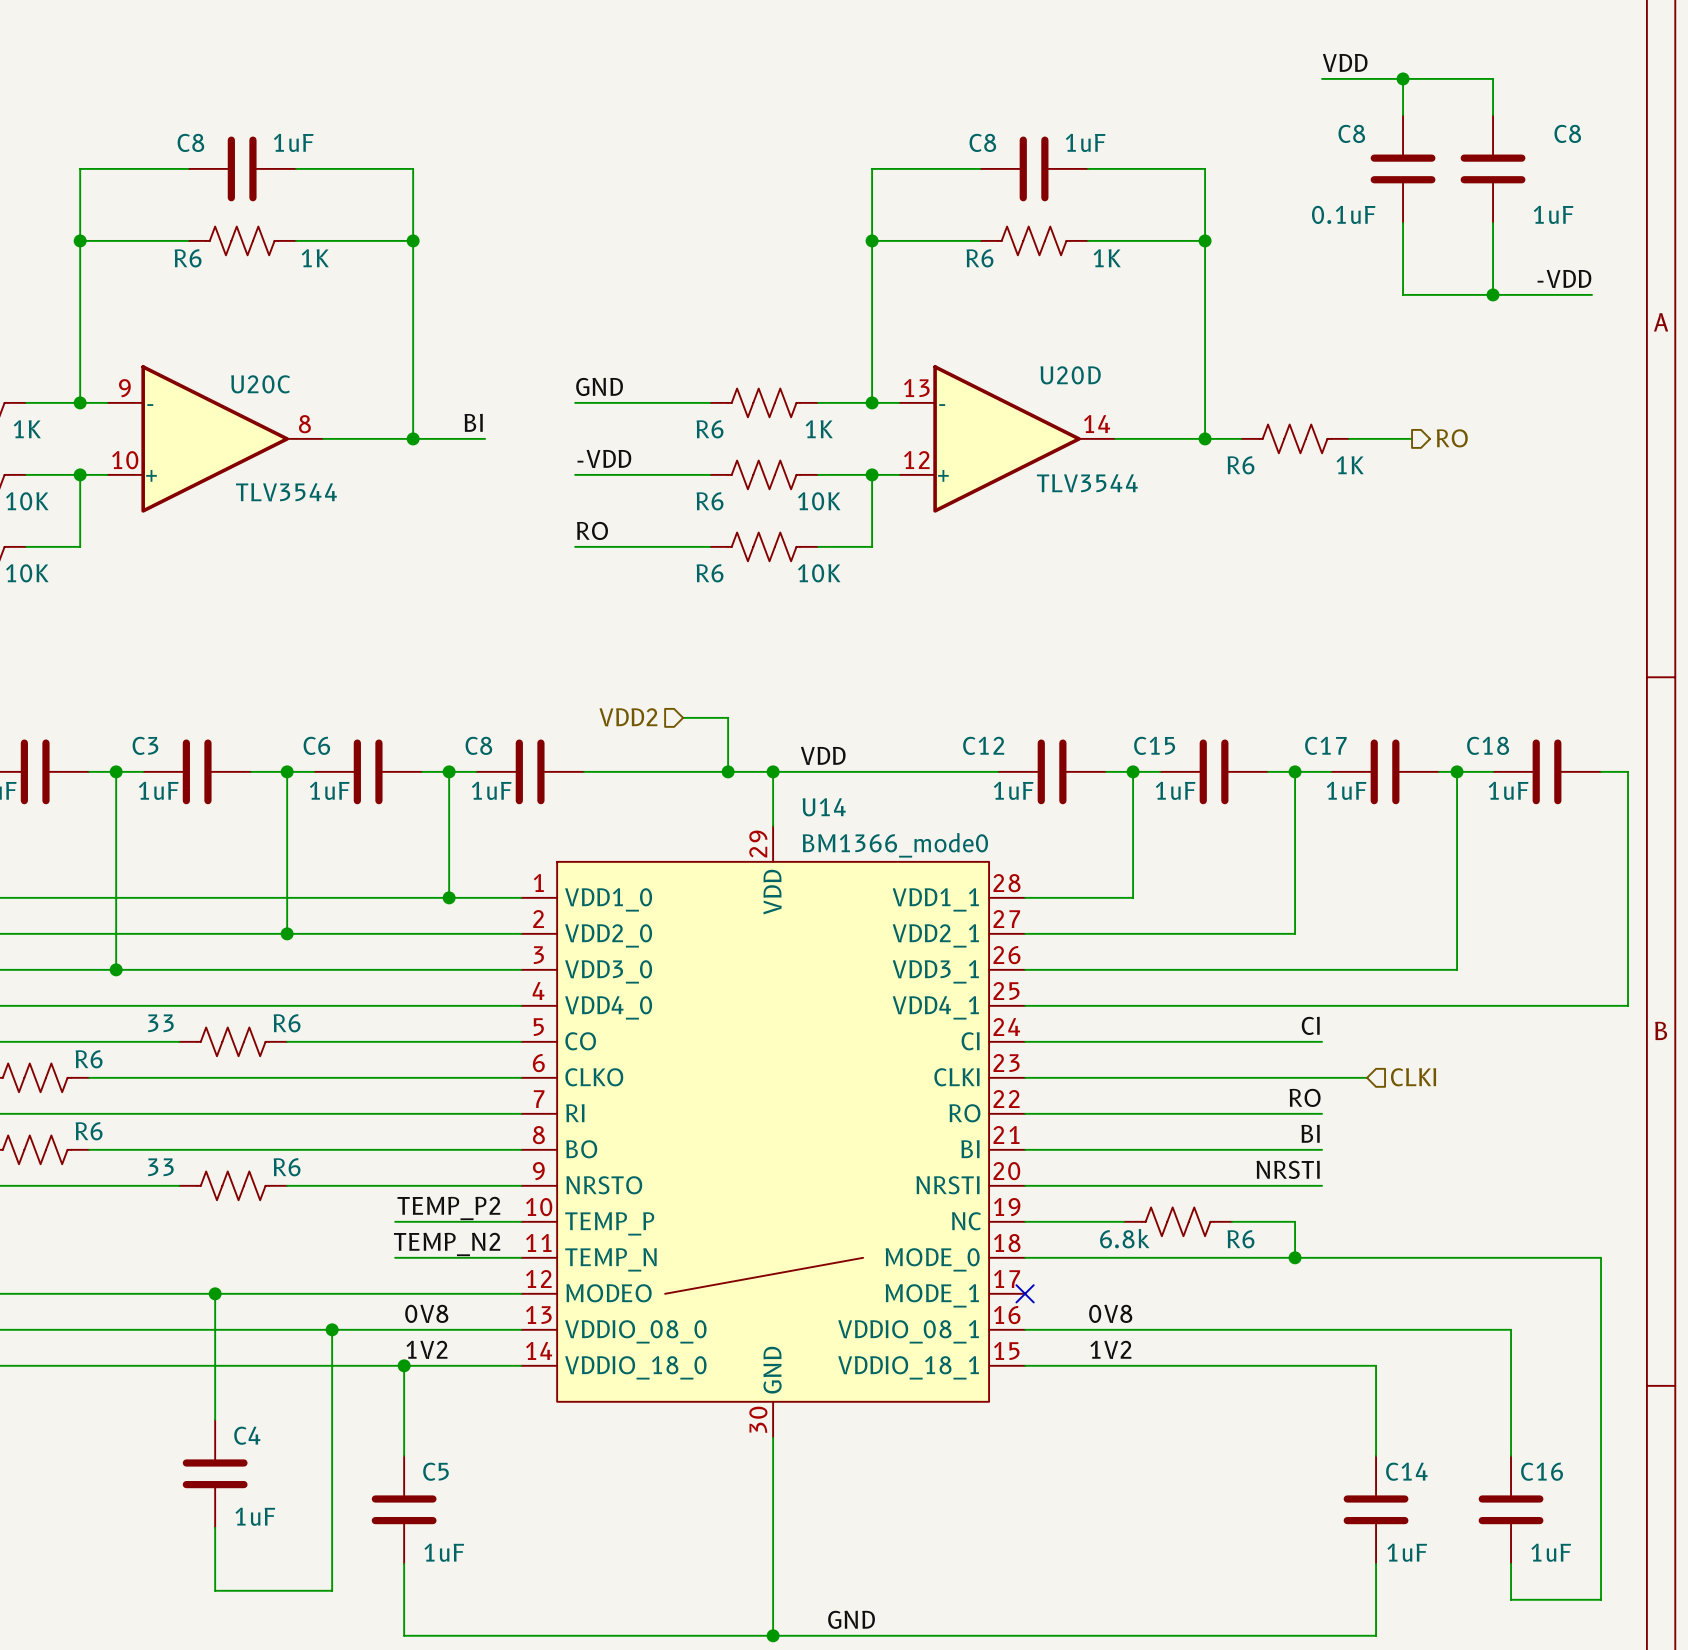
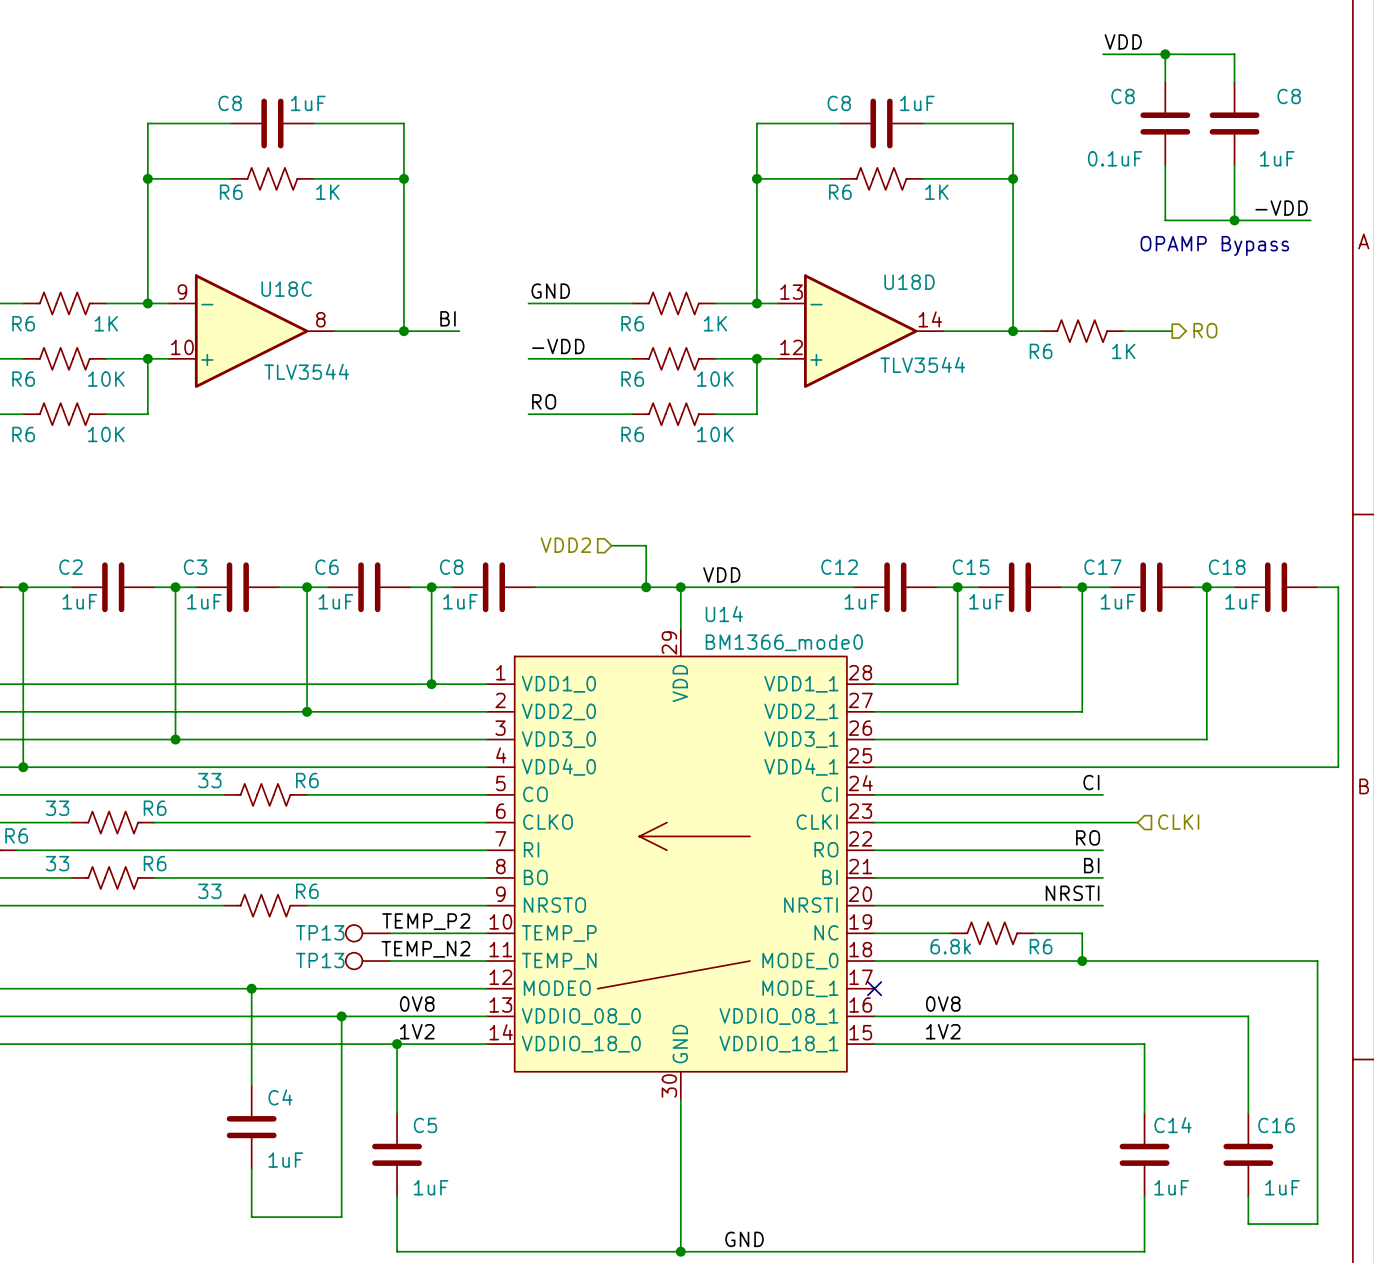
text: none -> OPAMP Bypass (1214, 245)
U20D name: U20D (1070, 375) -> U18D (909, 282)
U20C name: U20C (260, 384) -> U18C (286, 289)
U14 symbol: [521, 825, 1026, 1438] -> [487, 628, 875, 1100]
TP13: none -> (367, 933)
TP13: none -> (367, 961)

